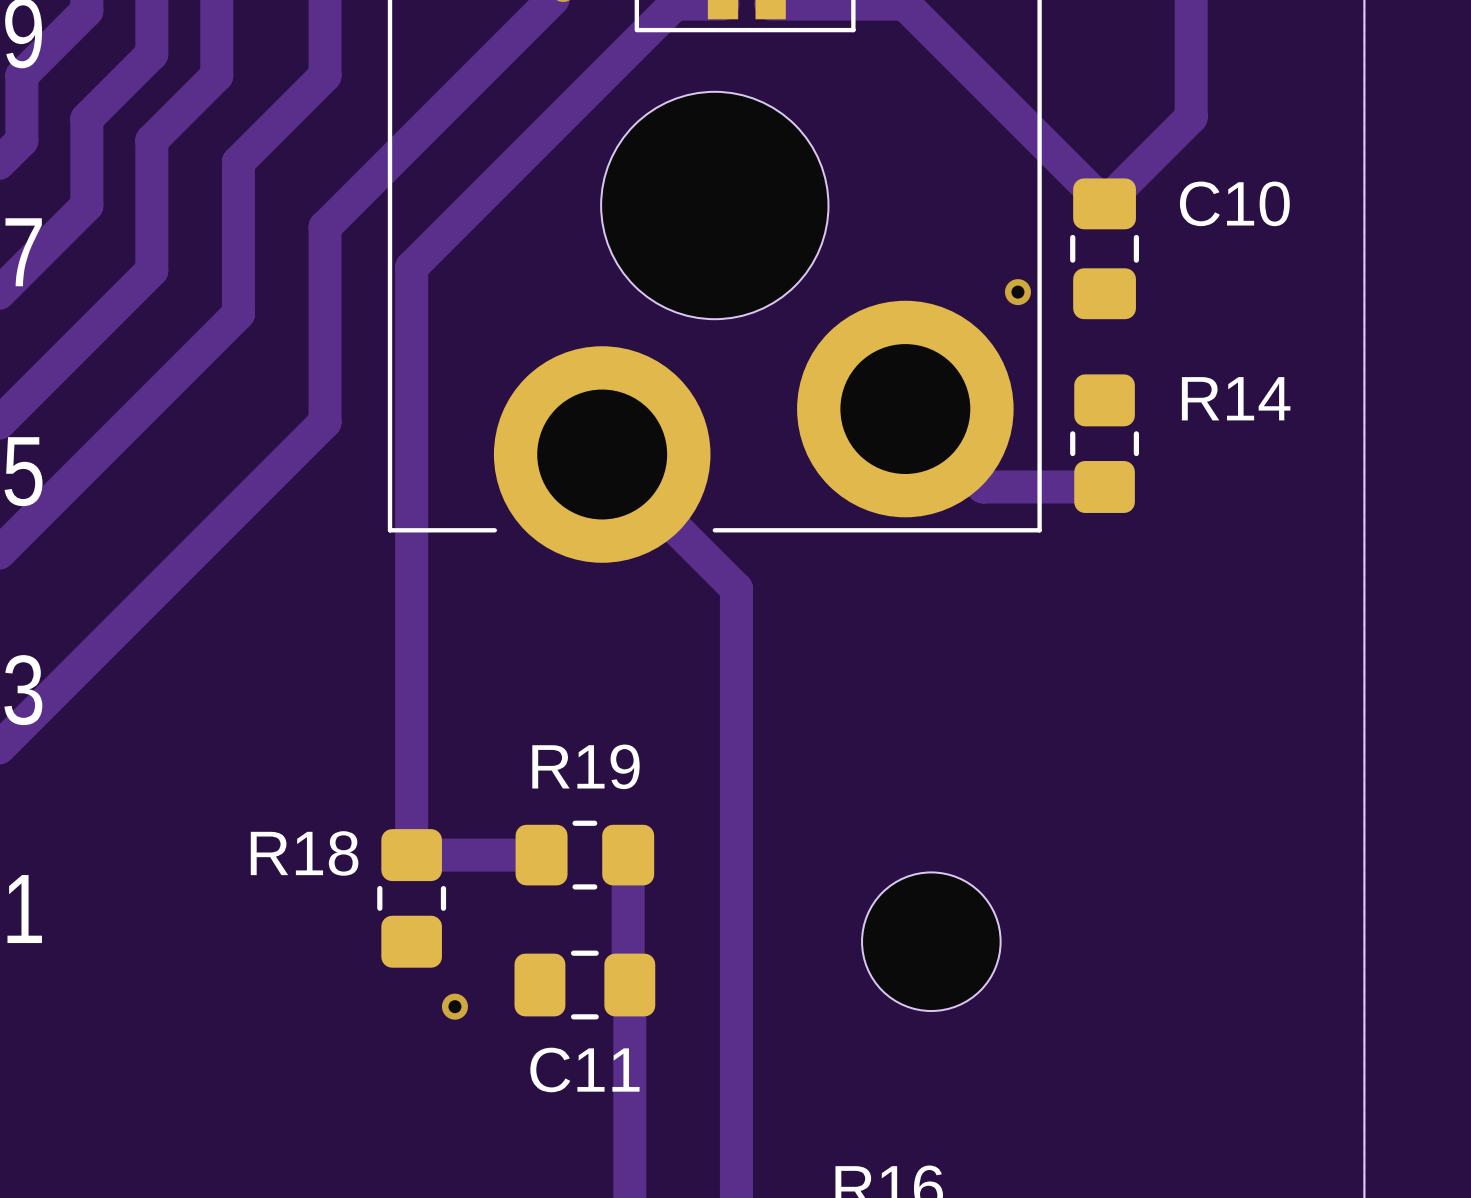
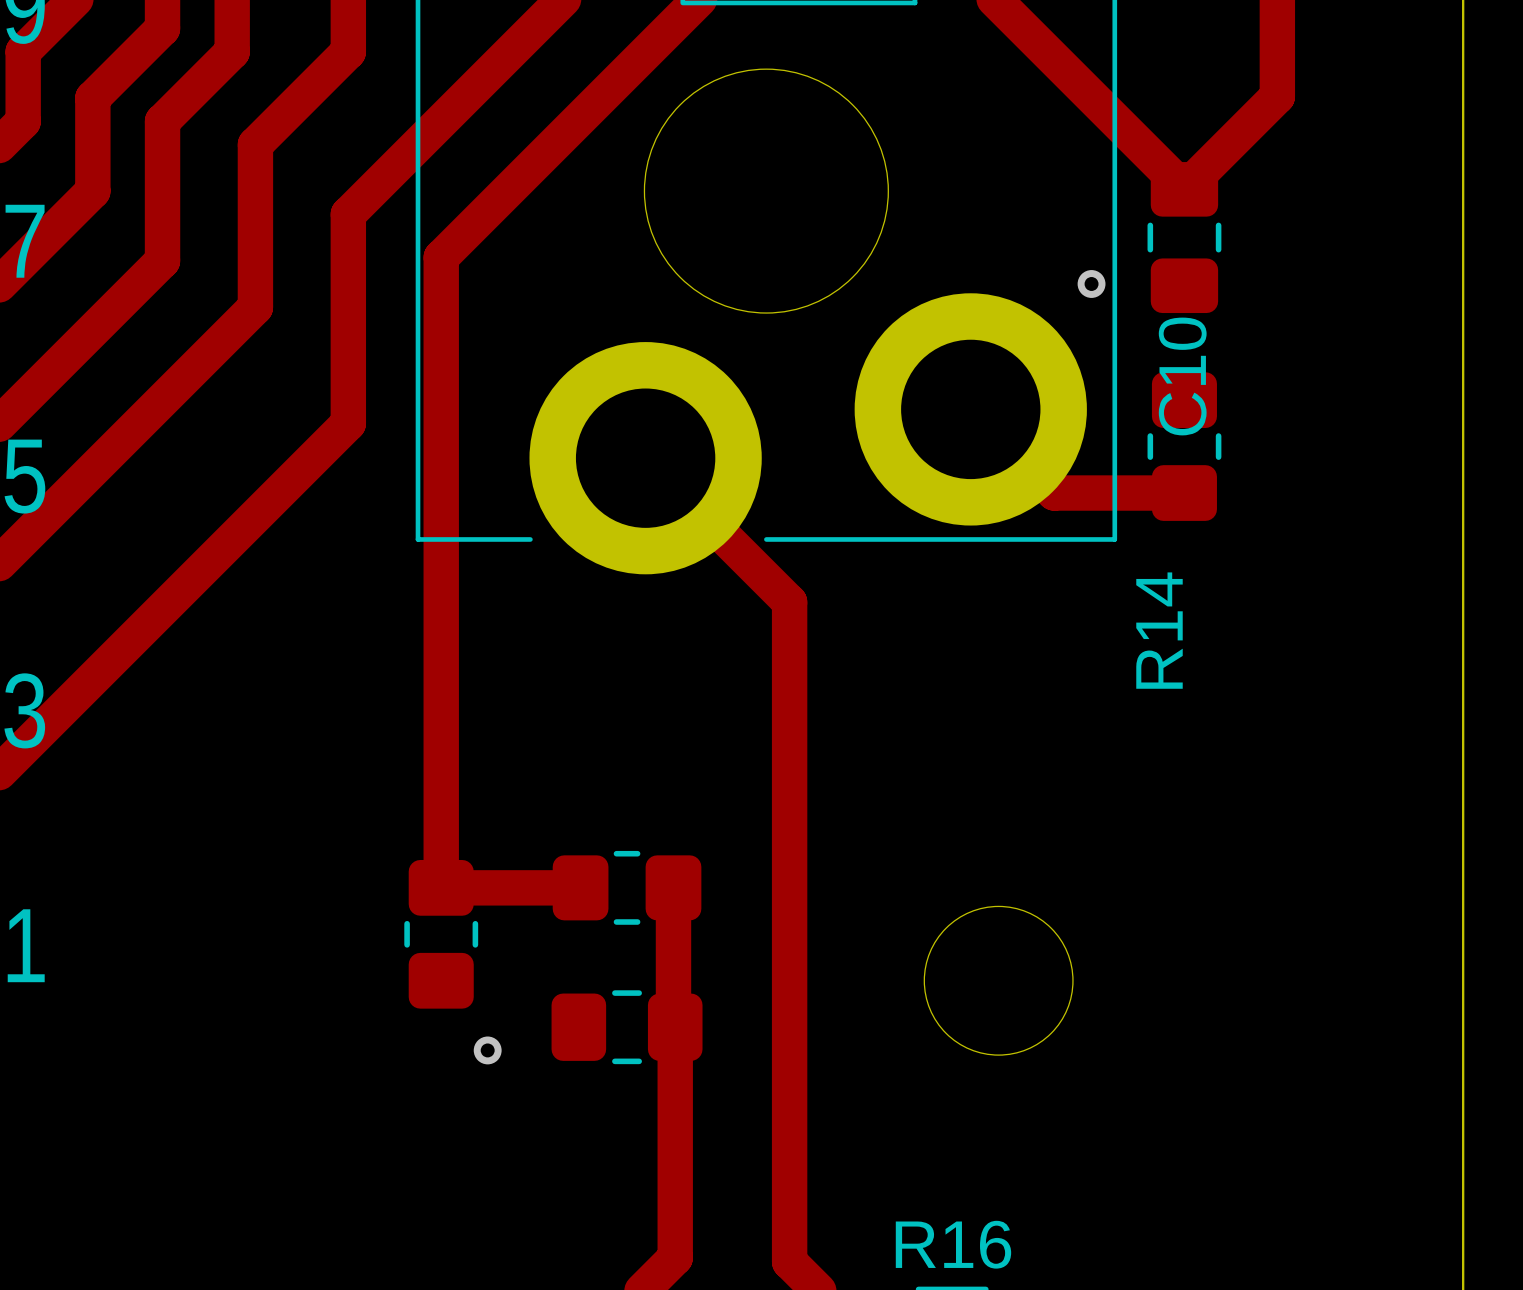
C10 name rotation: 0° (1234, 203) -> 90° counterclockwise (1182, 376)
C10 name position: C10 (1234, 203) -> C10 (1182, 376)
R14 name rotation: 0° (1236, 398) -> 90° counterclockwise (1159, 630)
R14 name position: R14 (1236, 398) -> R14 (1159, 630)
R19 name: R19 (585, 766) -> none
R18 name: R18 (304, 853) -> none
C11 name: C11 (584, 1070) -> none

